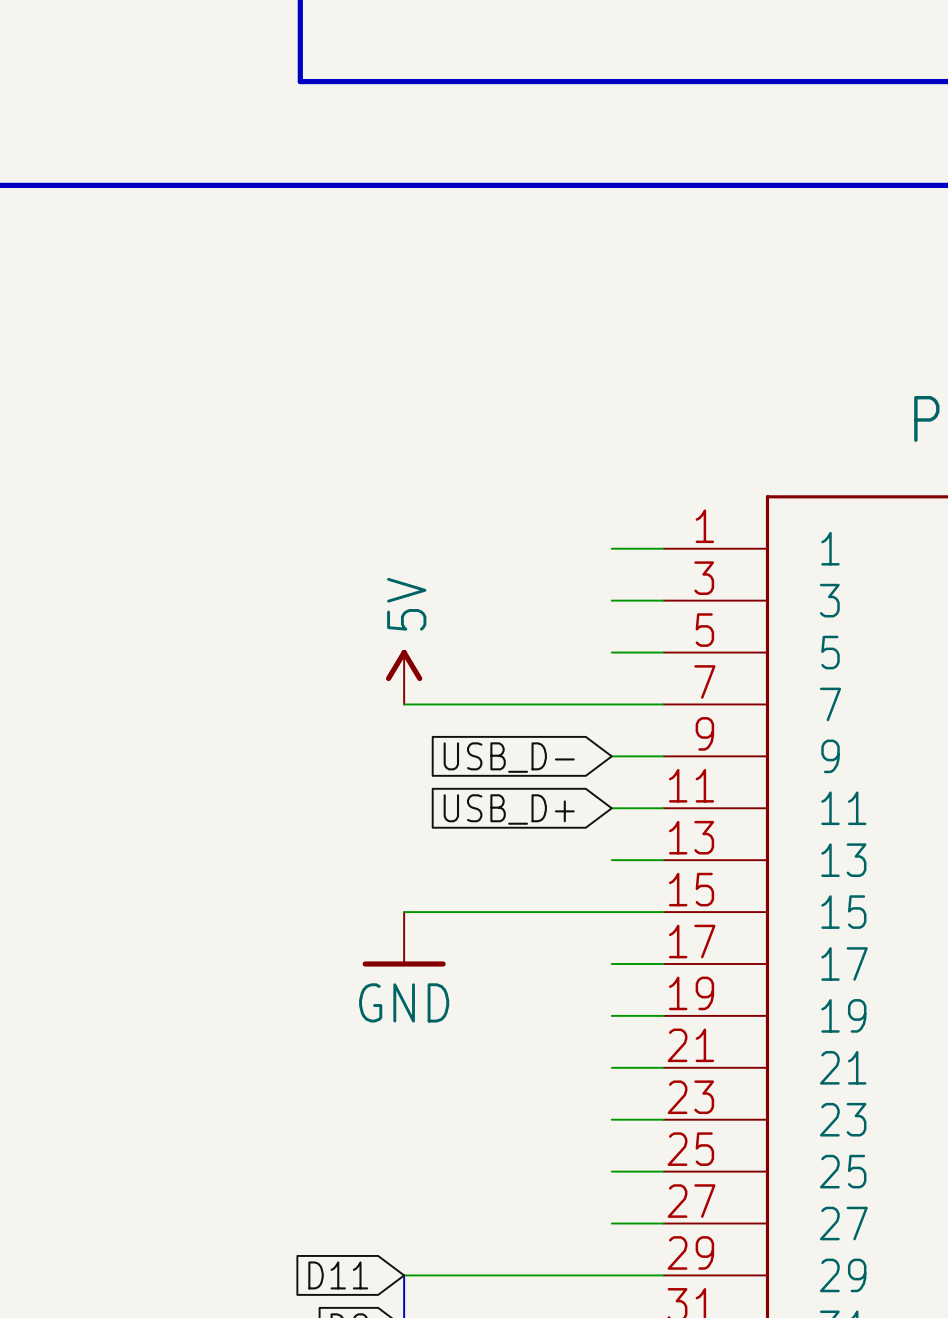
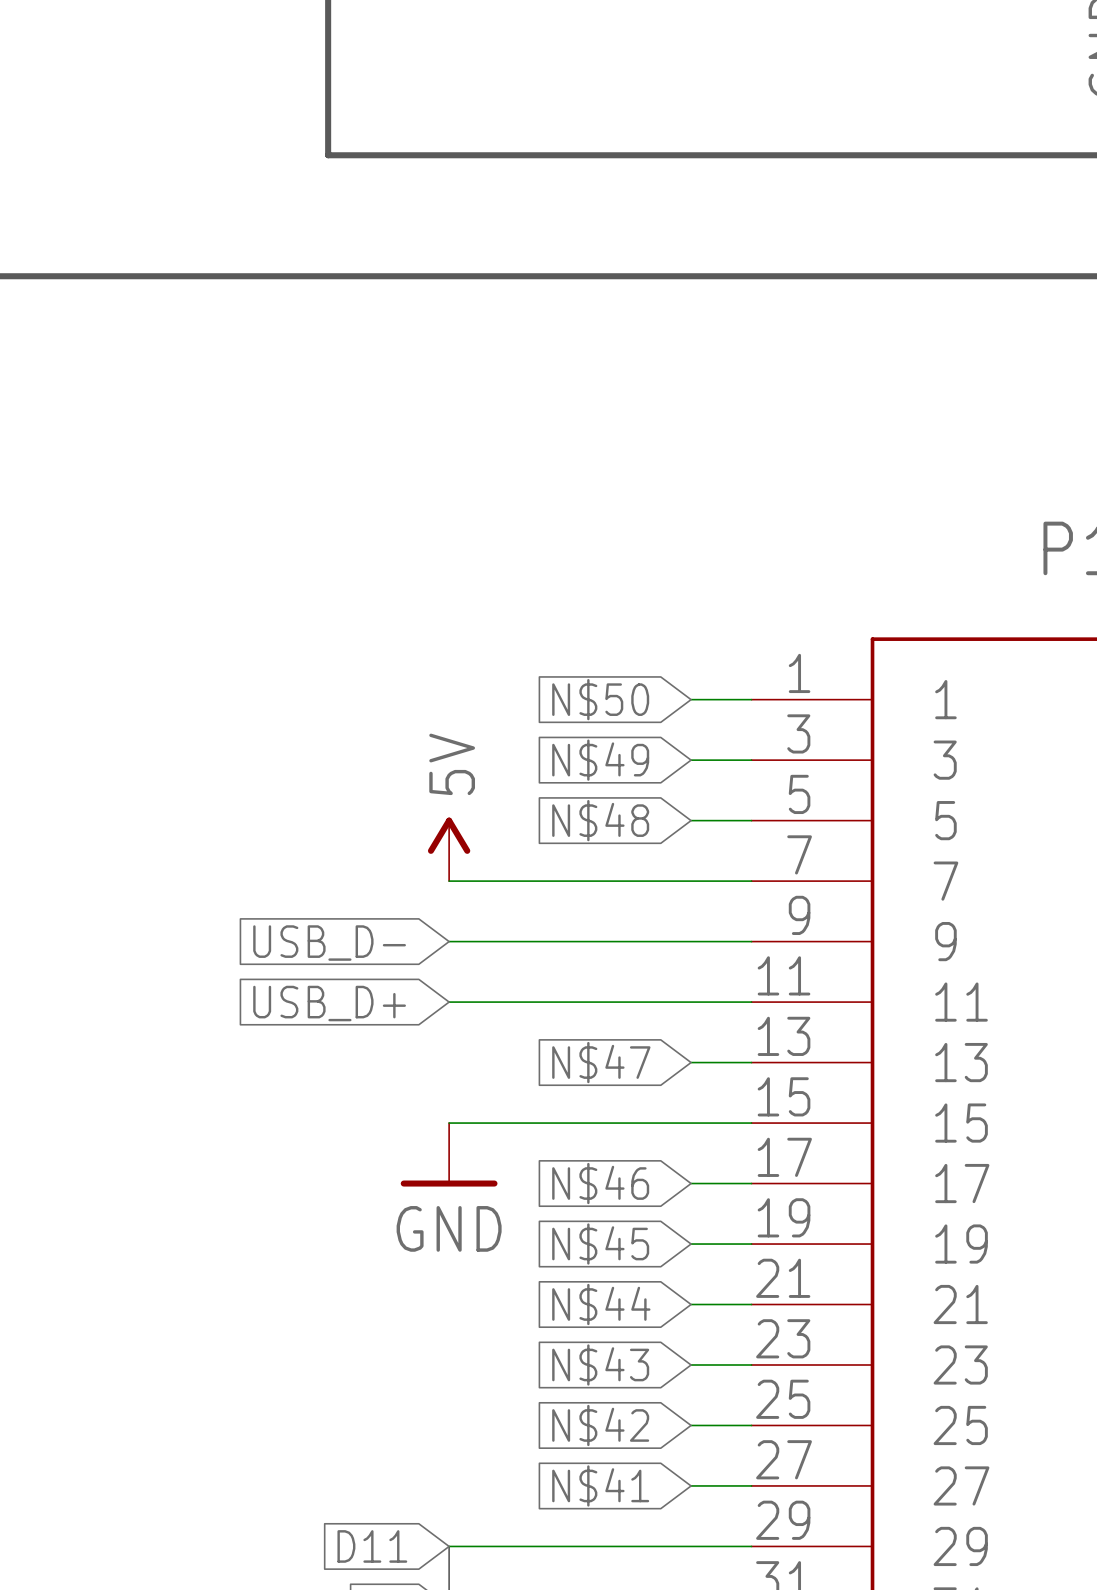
global label: none -> N$50 (600, 699)
global label: none -> N$49 (600, 760)
global label: none -> N$48 (600, 820)
wire: none -> (449, 941) (691, 941)
global label position: USB_D- (509, 757) -> USB_D- (329, 943)
wire: none -> (449, 1002) (691, 1002)
global label position: USB_D+ (509, 809) -> USB_D+ (329, 1003)
global label: none -> N$47 (601, 1062)
global label: none -> N$46 (600, 1183)
global label: none -> N$45 (600, 1244)
global label: none -> N$44 (601, 1304)
global label: none -> N$43 (600, 1364)
global label: none -> N$42 (600, 1425)
global label: none -> N$41 (600, 1485)

